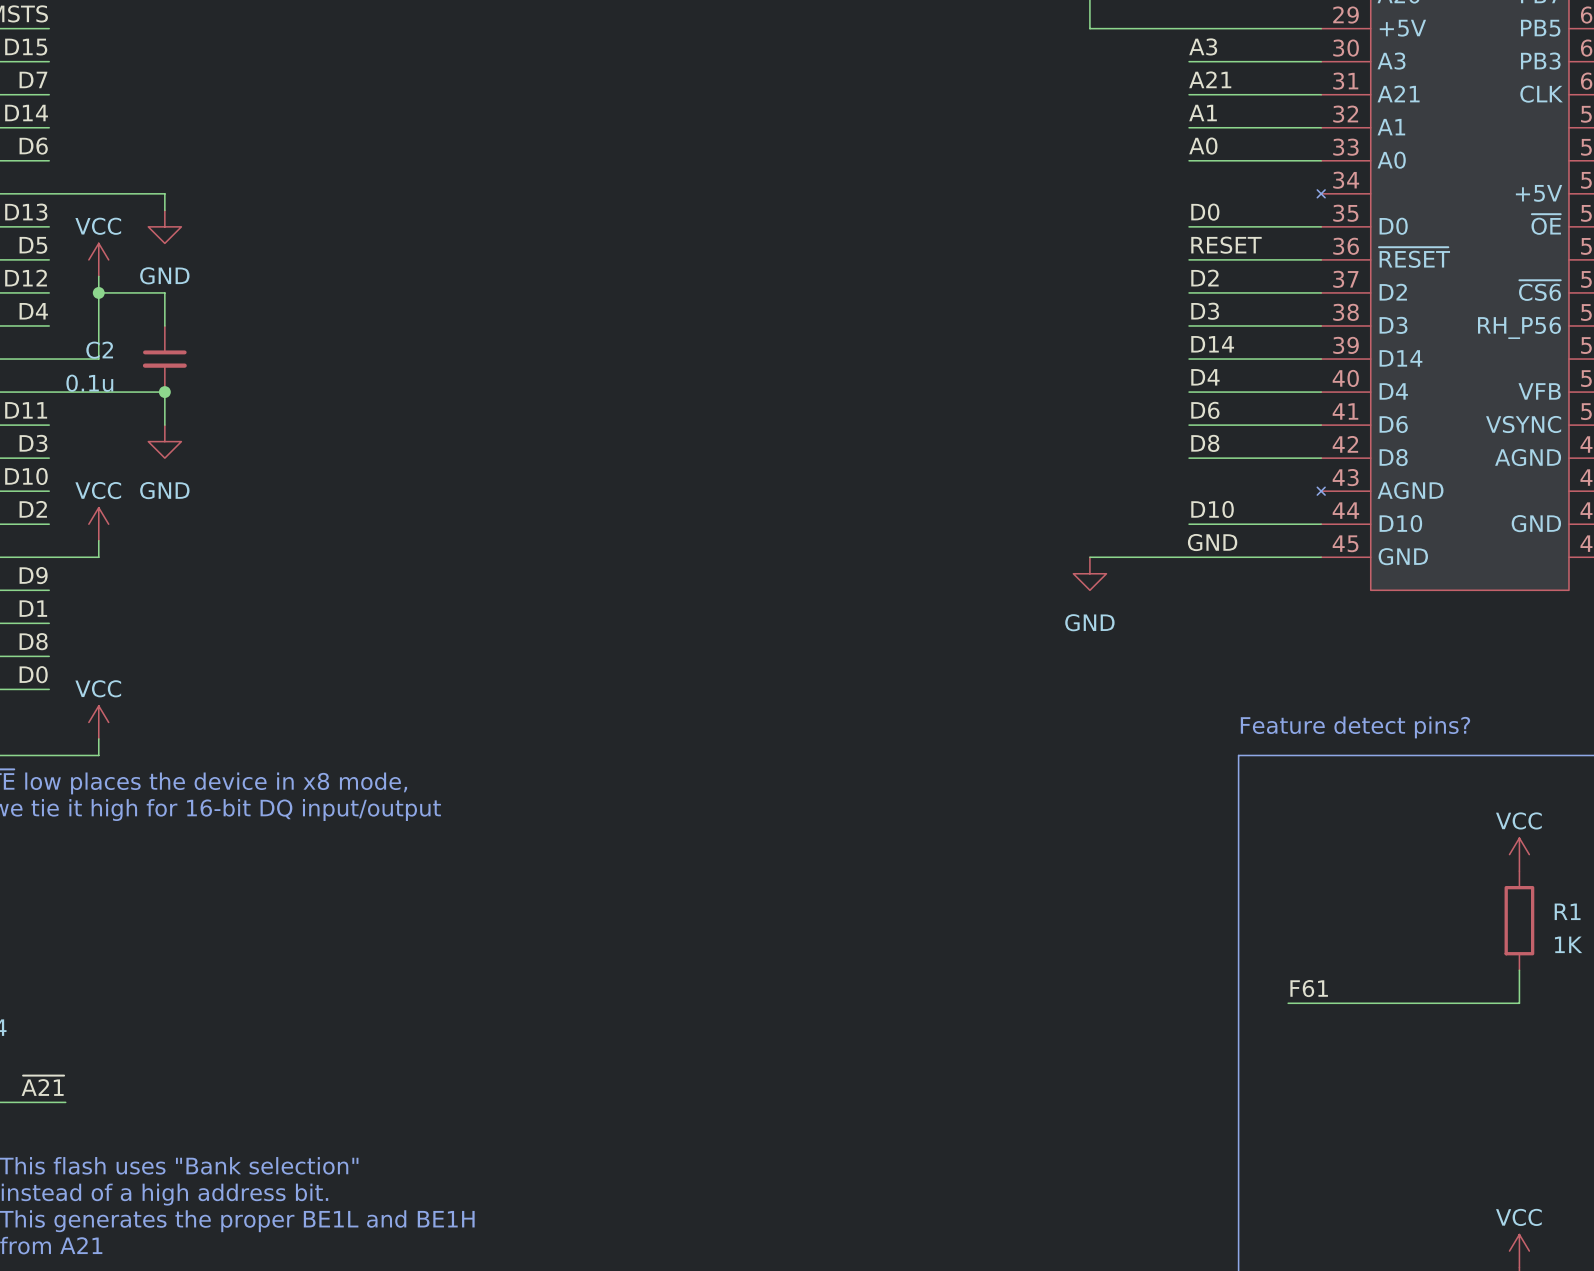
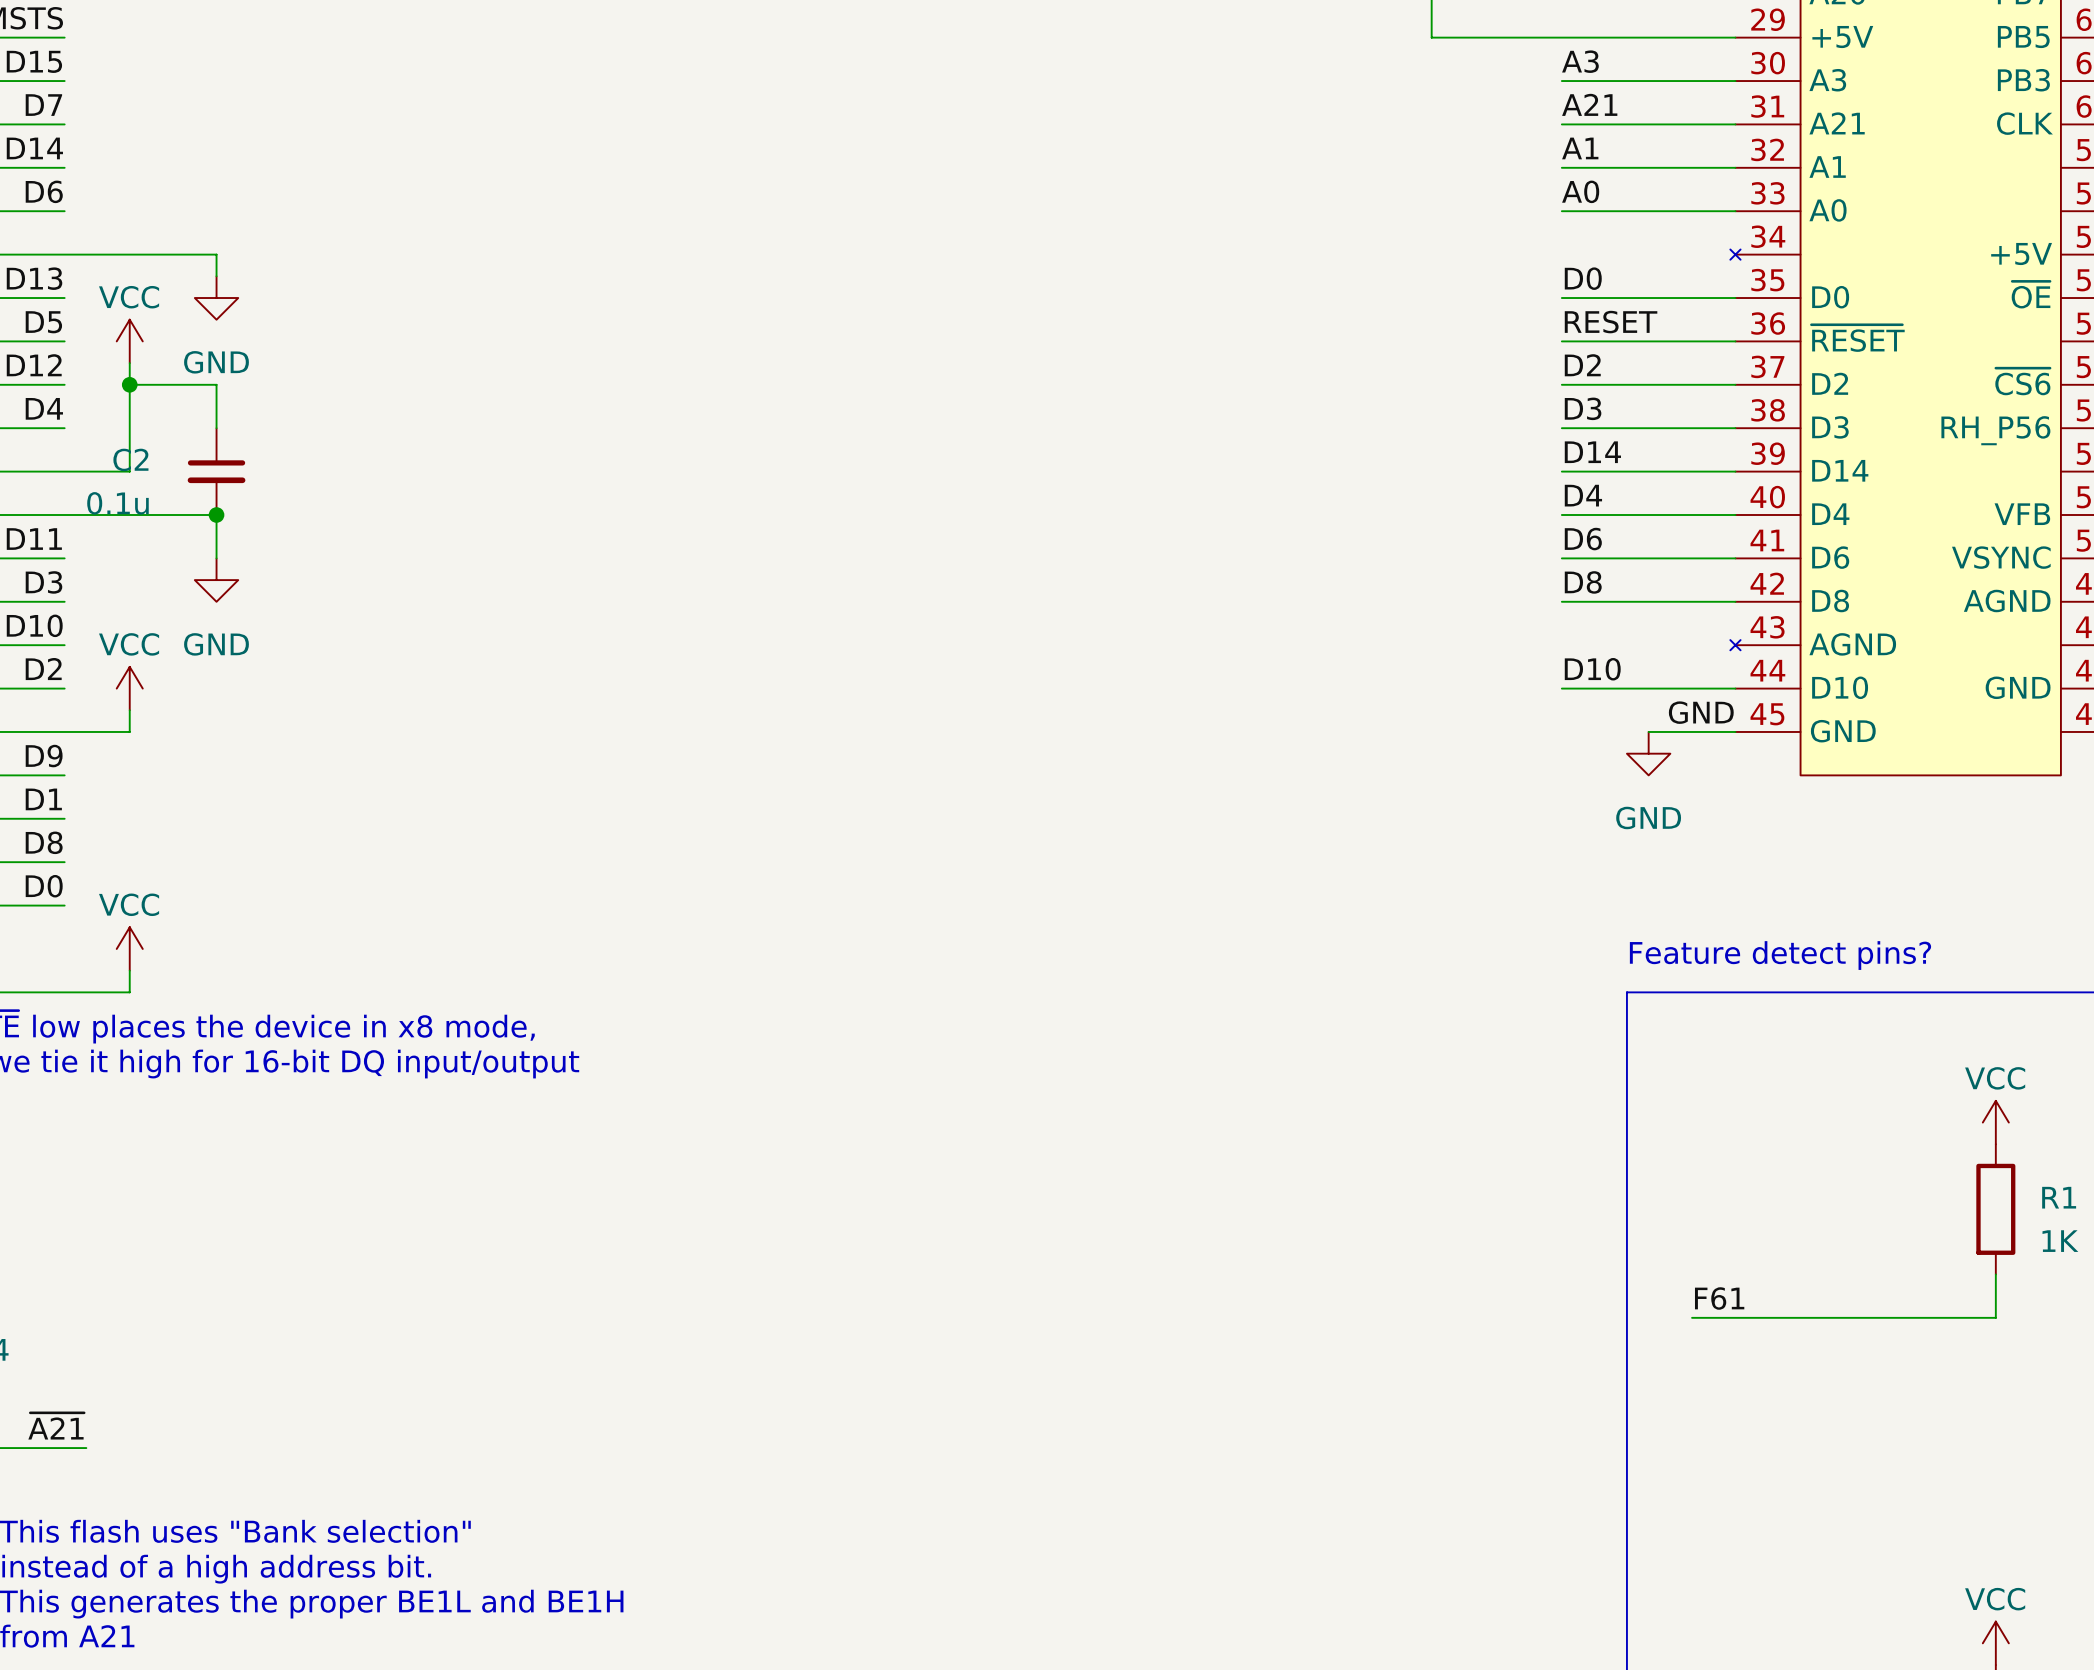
label position: GND (1212, 542) -> GND (1701, 712)
wire: (1089, 557) (1255, 557) -> none
power symbol position: GND (1089, 573) -> GND (1648, 753)

